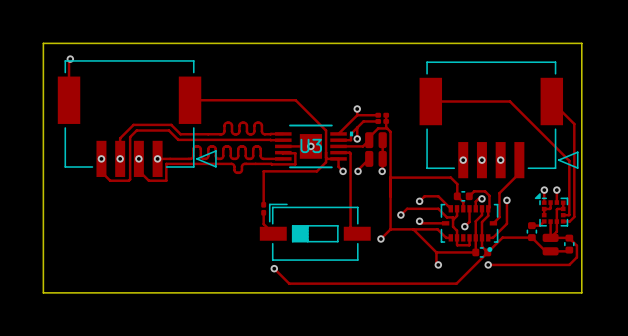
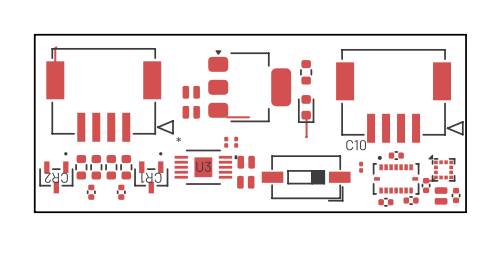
via: (70, 59) -> none
part: none -> (306, 72)
track: (190, 100) (295, 100) (326, 130) (326, 162) (316, 171) (263, 171) (263, 204) -> none
track: (430, 101) (510, 101) (569, 160) (569, 214) (563, 215) -> none
track: (551, 101) (574, 124) (574, 216) (569, 221) (563, 221) -> none
part: none -> (249, 86)
via: (357, 108) -> none
part: none -> (191, 92)
track: (378, 115) (357, 115) (338, 133) -> none
part: (382, 115) -> none
track: (386, 115) (386, 127) (390, 131) (390, 229) -> none
track: (378, 121) (363, 121) (351, 133) (351, 140) (338, 140) -> none
part: (382, 121) -> none
track: (357, 127) (357, 138) -> none
track: (387, 128) (378, 128) (362, 146) (338, 146) -> none
track: (283, 133) (263, 133) (261, 124) (259, 122) (254, 124) (254, 132) (251, 134) (247, 132) (246, 124) (244, 122) (239, 124) (239, 132) (236, 134) (232, 132) (231, 124) (229, 122) (224, 124) (224, 132) (221, 134) (180, 134) (171, 124) (133, 124) (120, 138) (120, 170) -> none
part: none -> (306, 108)
via: (357, 138) -> none
C10: none -> (191, 112)
track: (283, 140) (178, 139) (168, 130) (136, 130) (130, 137) (130, 179) (110, 180) (101, 171) -> none
part: (375, 140) -> none
via: (310, 146) -> none
U3 position: (314, 146) -> (205, 167)
track: (283, 152) (295, 153) -> none
track: (338, 152) (350, 153) (350, 227) (357, 233) -> none
track: (295, 153) (295, 164) (244, 163) (239, 172) (235, 171) (234, 165) (231, 163) (166, 163) (166, 180) (148, 180) (138, 170) (138, 158) -> none
track: (326, 157) (338, 158) (338, 166) (343, 171) -> none
via: (101, 158) -> none
via: (120, 158) -> none
via: (138, 158) -> none
track: (157, 158) (191, 158) (193, 148) (196, 146) (200, 147) (200, 156) (203, 158) (207, 157) (208, 148) (211, 146) (215, 148) (217, 158) (222, 157) (223, 148) (226, 146) (230, 148) (231, 157) (236, 158) (238, 148) (242, 146) (245, 148) (246, 157) (250, 158) (253, 156) (253, 148) (257, 146) (260, 148) (262, 158) (283, 158) -> none
via: (157, 158) -> none
track: (369, 158) (358, 171) -> none
part: (375, 158) -> none
via: (463, 160) -> none
via: (481, 160) -> none
via: (500, 160) -> none
track: (519, 160) (519, 173) (499, 193) (499, 217) (493, 223) -> none
via: (343, 171) -> none
via: (358, 171) -> none
via: (382, 171) -> none
U3 text: none -> * (178, 139)
part: none -> (226, 142)
part: none -> (236, 142)
track: (390, 177) (450, 177) (457, 184) (457, 196) (463, 202) (463, 208) -> none
track: (544, 190) (544, 202) -> none
via: (544, 190) -> none
track: (556, 190) (556, 202) -> none
via: (556, 190) -> none
part position: (463, 196) -> (396, 155)
track: (469, 196) (474, 191) (485, 191) (489, 195) (488, 215) (481, 222) (481, 246) (487, 252) -> none
track: (481, 198) (475, 201) (475, 208) -> none
via: (481, 198) -> none
track: (506, 200) (506, 223) (492, 237) (488, 237) -> none
via: (506, 200) -> none
track: (419, 201) (424, 196) (438, 196) (450, 208) -> none
via: (419, 201) -> none
part: none -> (246, 162)
track: (550, 202) (550, 208) (544, 208) (544, 215) -> none
track: (563, 202) (563, 208) (556, 209) (556, 231) (550, 237) -> none
part footprint: [259, 203, 371, 261] -> [237, 175, 255, 189]
part: none -> (81, 167)
part: none -> (96, 167)
part: none -> (111, 167)
part: none -> (126, 167)
part: (263, 208) -> none
part: none -> (361, 167)
track: (457, 208) (457, 215) (453, 219) -> none
track: (469, 208) (469, 221) (464, 226) -> none
track: (481, 208) (481, 215) (475, 221) (475, 252) (436, 252) -> none
track: (263, 212) (263, 224) (273, 233) -> none
CR2: none -> (56, 172)
CR1: none -> (151, 172)
track: (400, 215) (407, 208) (438, 208) (446, 217) (453, 217) (453, 226) (457, 230) (457, 245) (469, 245) (469, 237) -> none
via: (400, 215) -> none
track: (419, 221) (421, 223) (445, 223) -> none
via: (419, 221) -> none
track: (550, 221) (550, 237) -> none
part: none -> (306, 178)
via: (464, 226) -> none
part rotation: 0° (469, 227) -> 180° (396, 175)
track: (390, 229) (437, 229) (446, 237) (450, 237) -> none
track: (390, 229) (380, 238) -> none
track: (413, 229) (436, 252) -> none
track: (550, 237) (569, 237) (576, 245) (576, 257) (569, 264) (488, 264) -> none
via: (380, 238) -> none
part: none -> (91, 192)
part: none -> (121, 192)
part: none -> (411, 200)
track: (569, 250) (545, 251) (531, 237) (502, 237) (456, 283) (289, 283) (274, 268) -> none
track: (436, 252) (436, 263) (438, 264) -> none
board edge: (43, 264) (43, 292) (581, 292) (581, 264) -> (34, 212) (466, 212)
via: (438, 264) -> none
via: (488, 264) -> none
via: (274, 268) -> none

